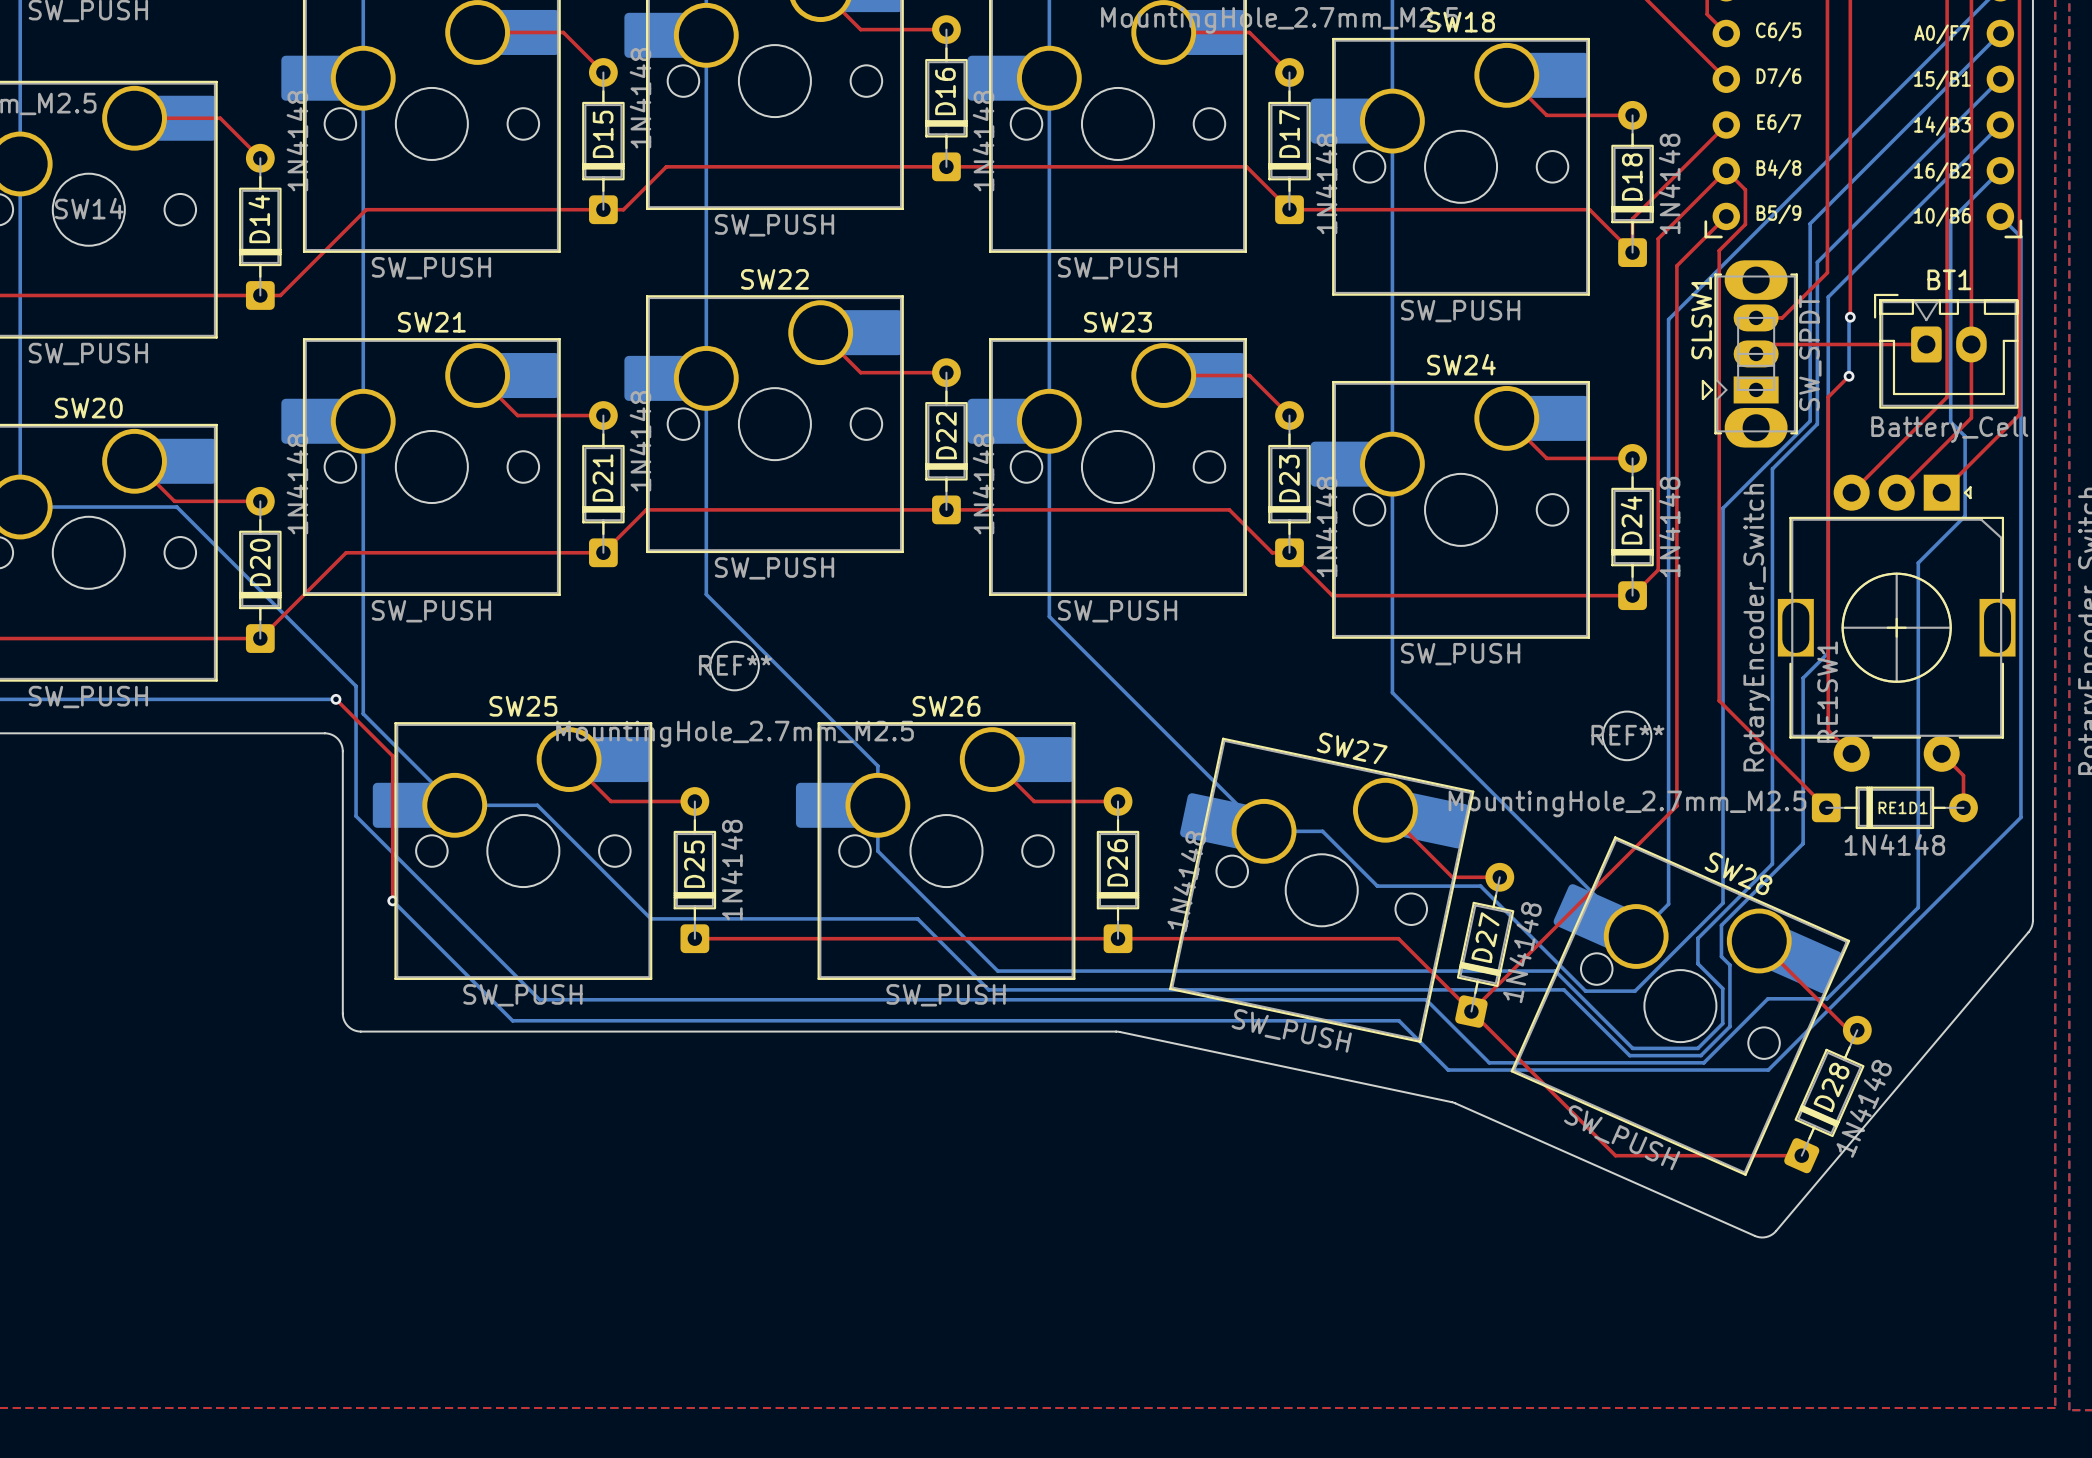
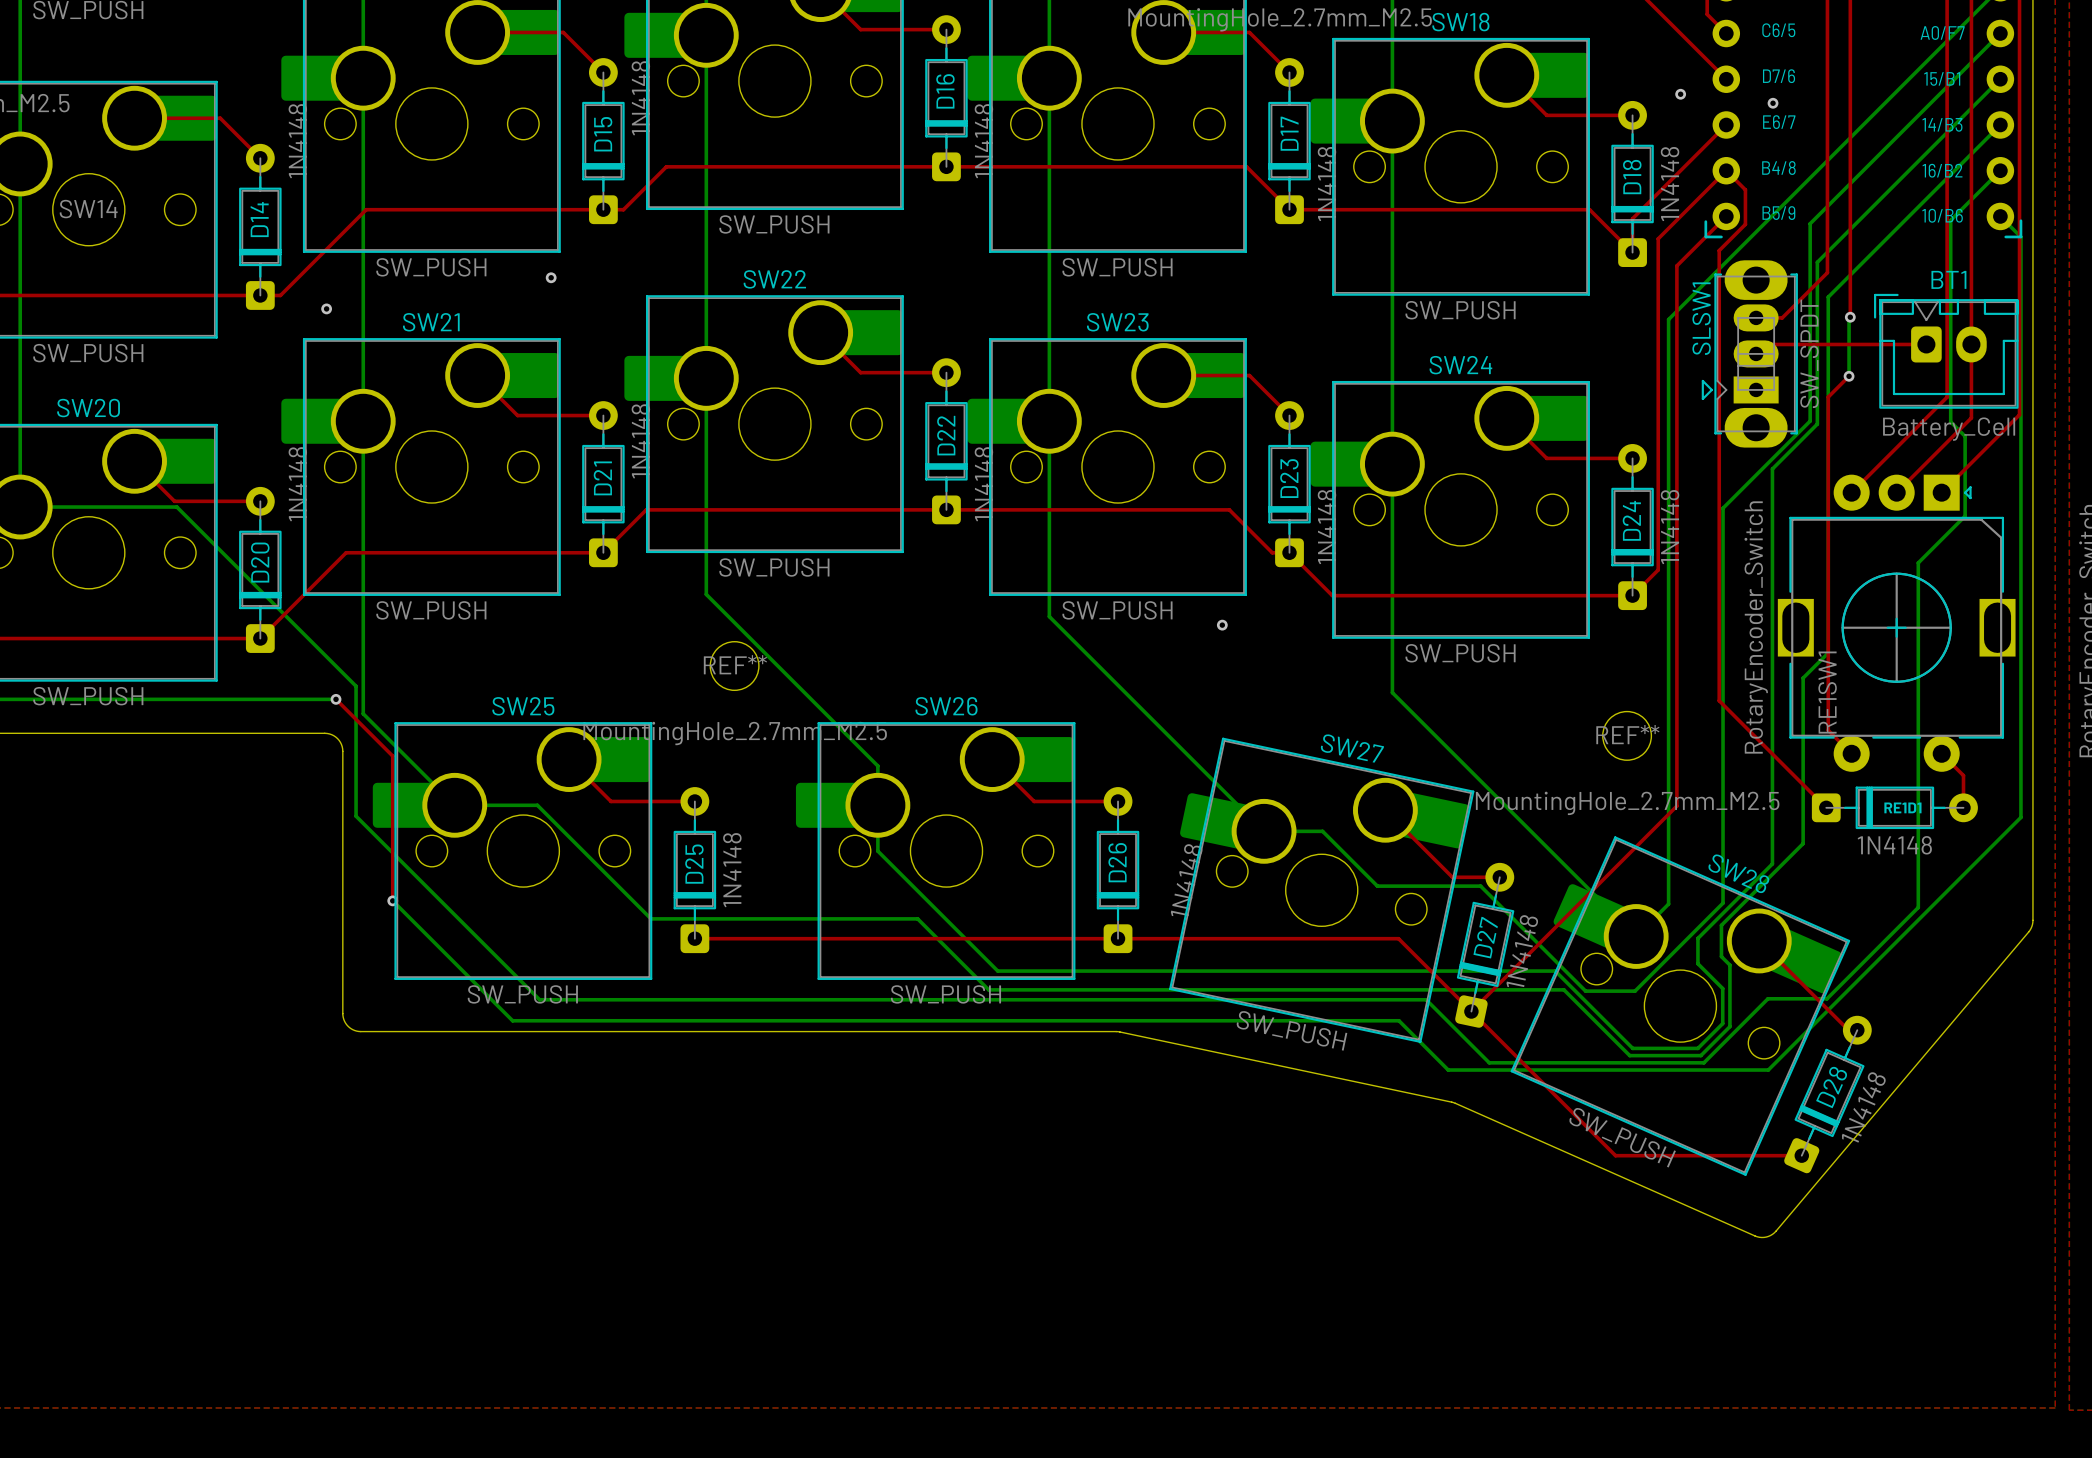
via: none -> (1680, 94)
via: none -> (1773, 103)
via: none -> (551, 277)
via: none -> (326, 308)
via: none -> (1222, 625)

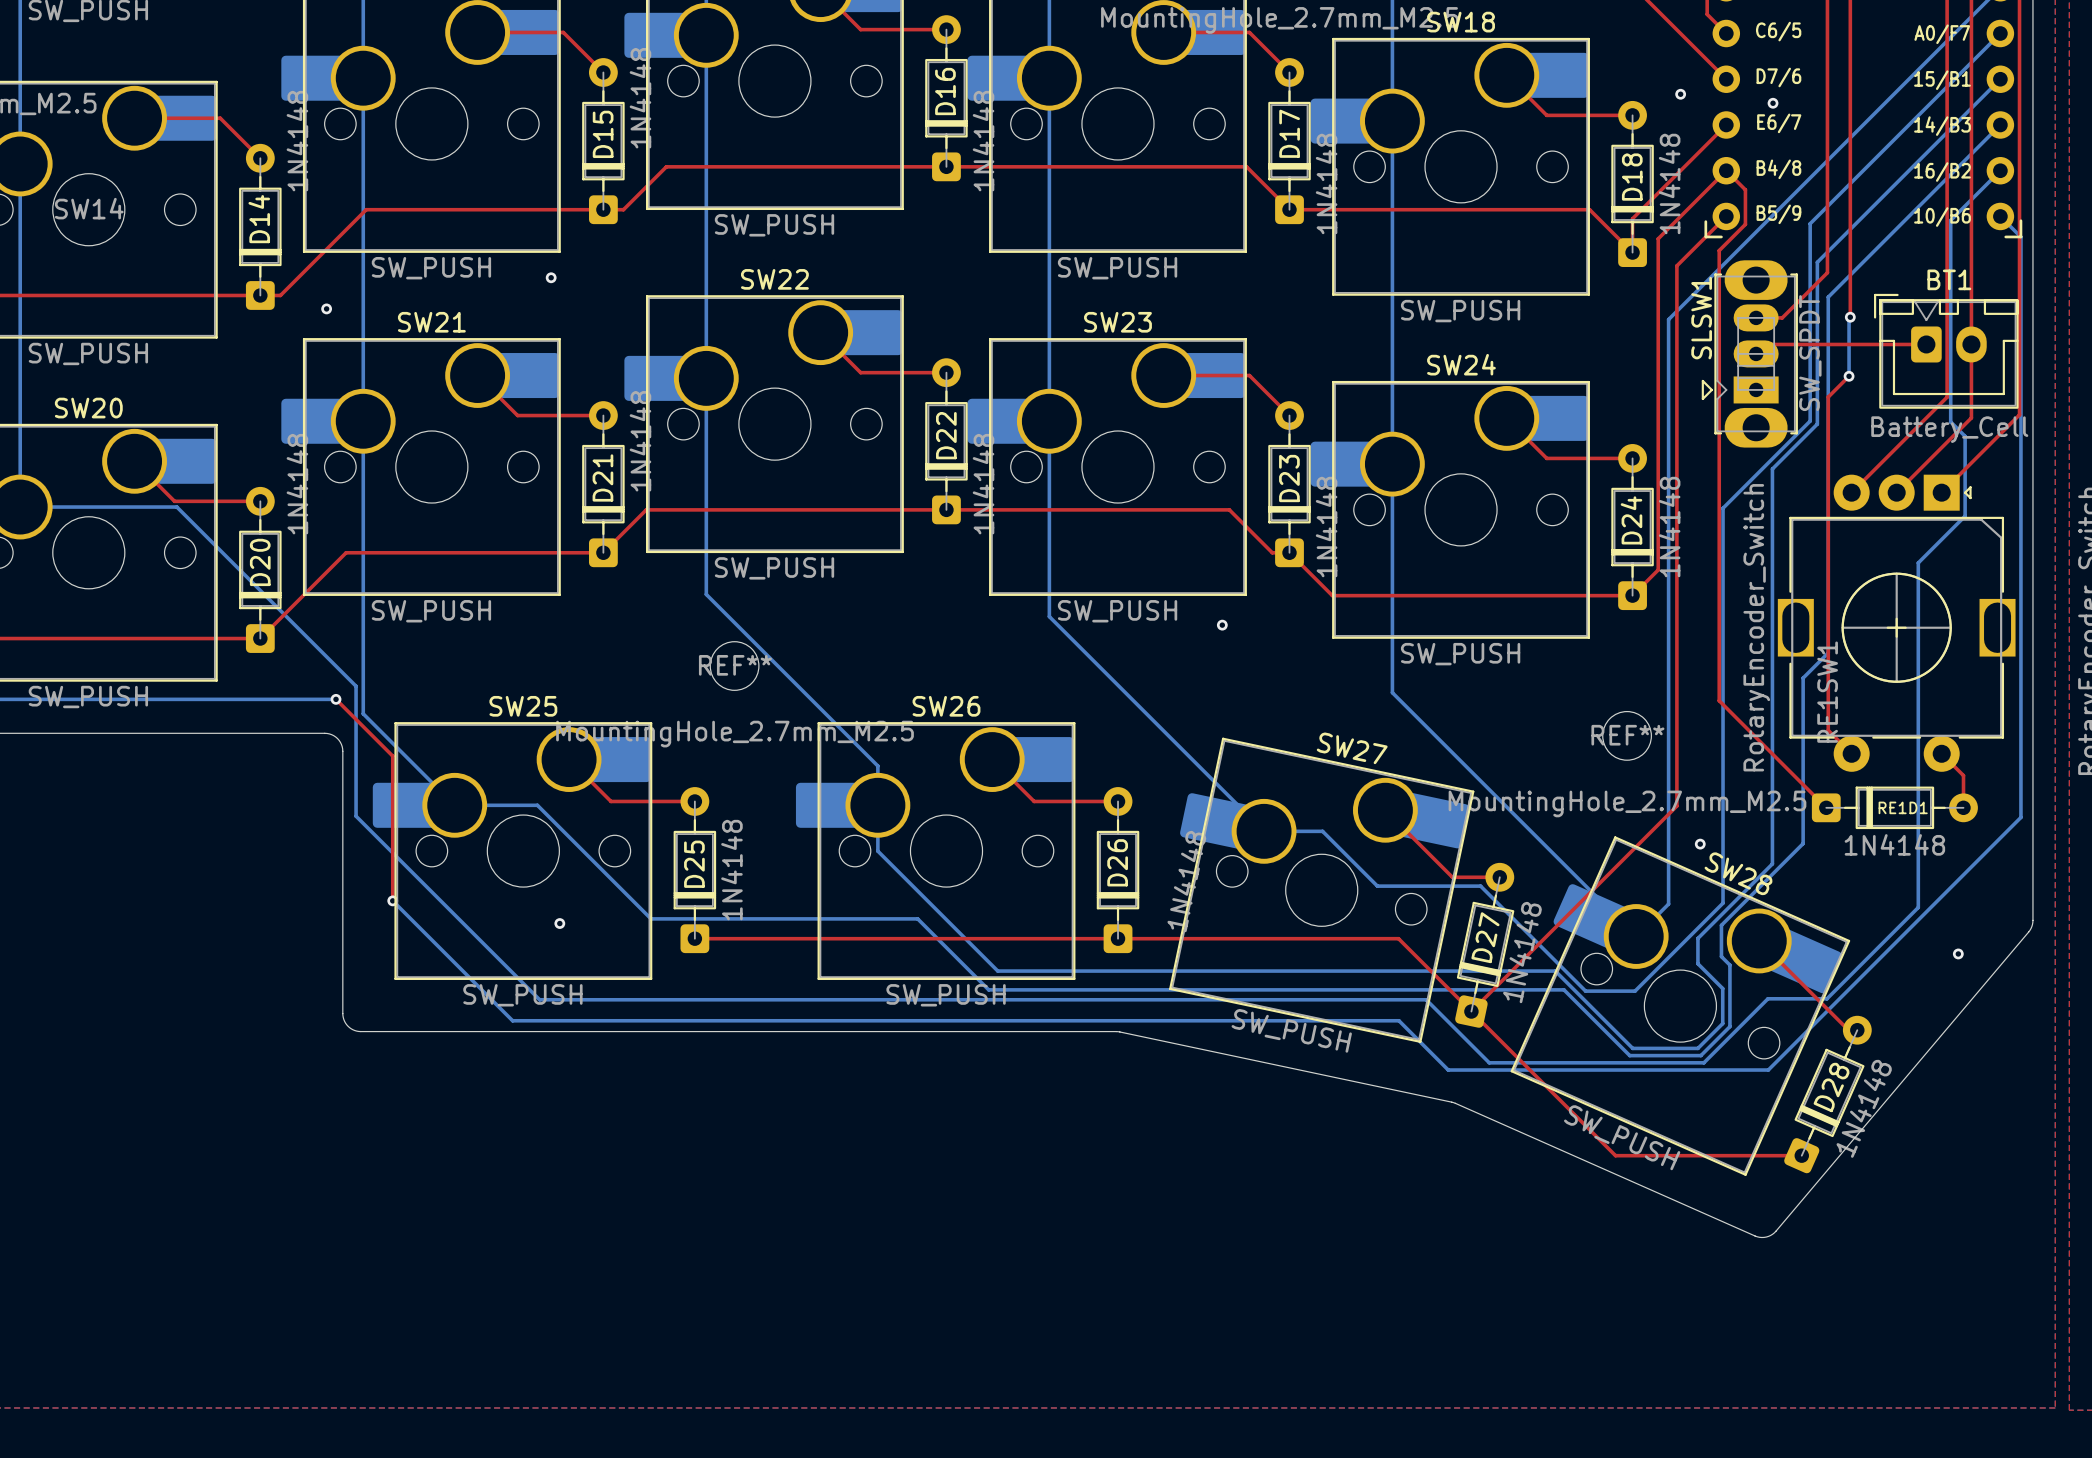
via: none -> (1700, 844)
via: none -> (559, 923)
via: none -> (1958, 953)

